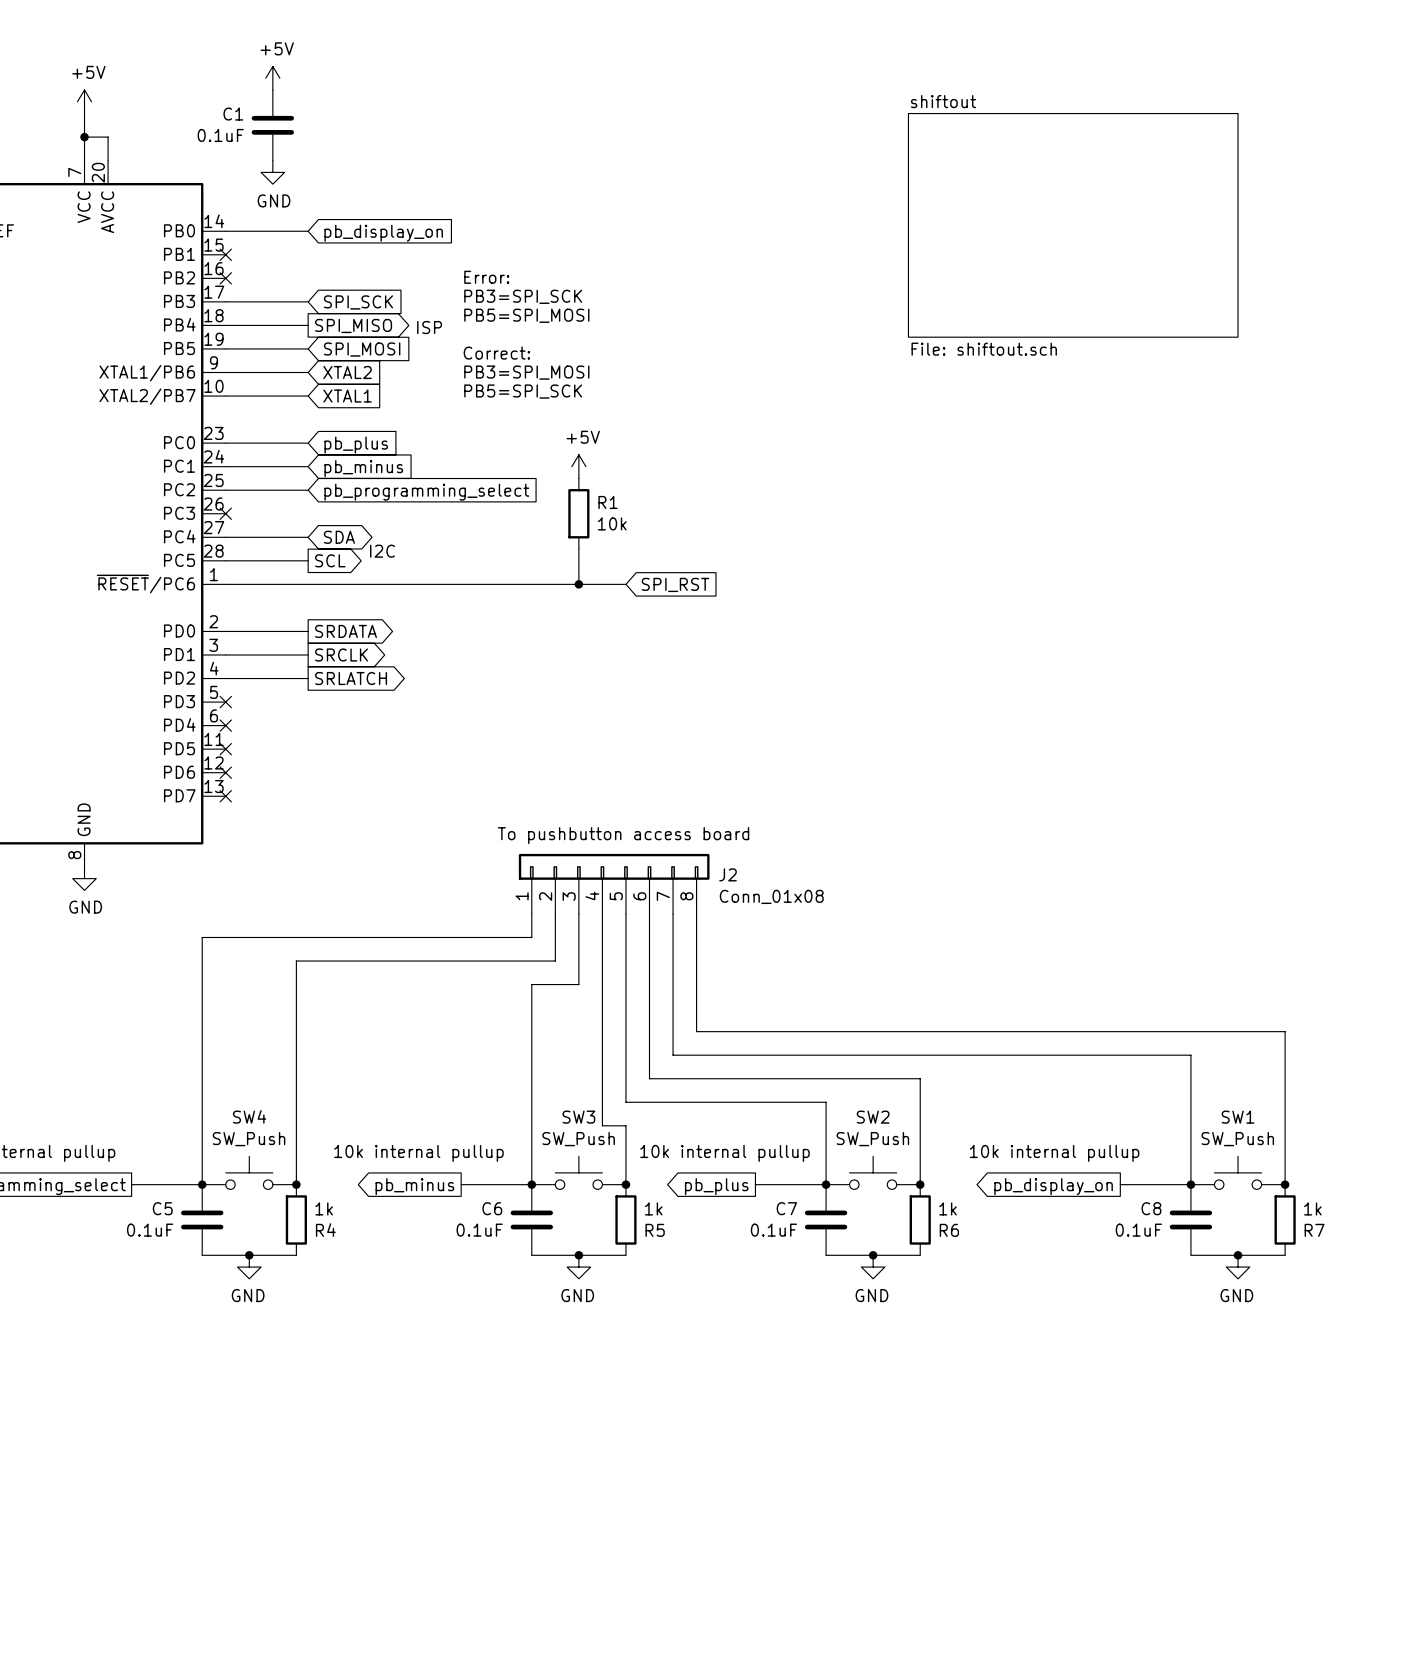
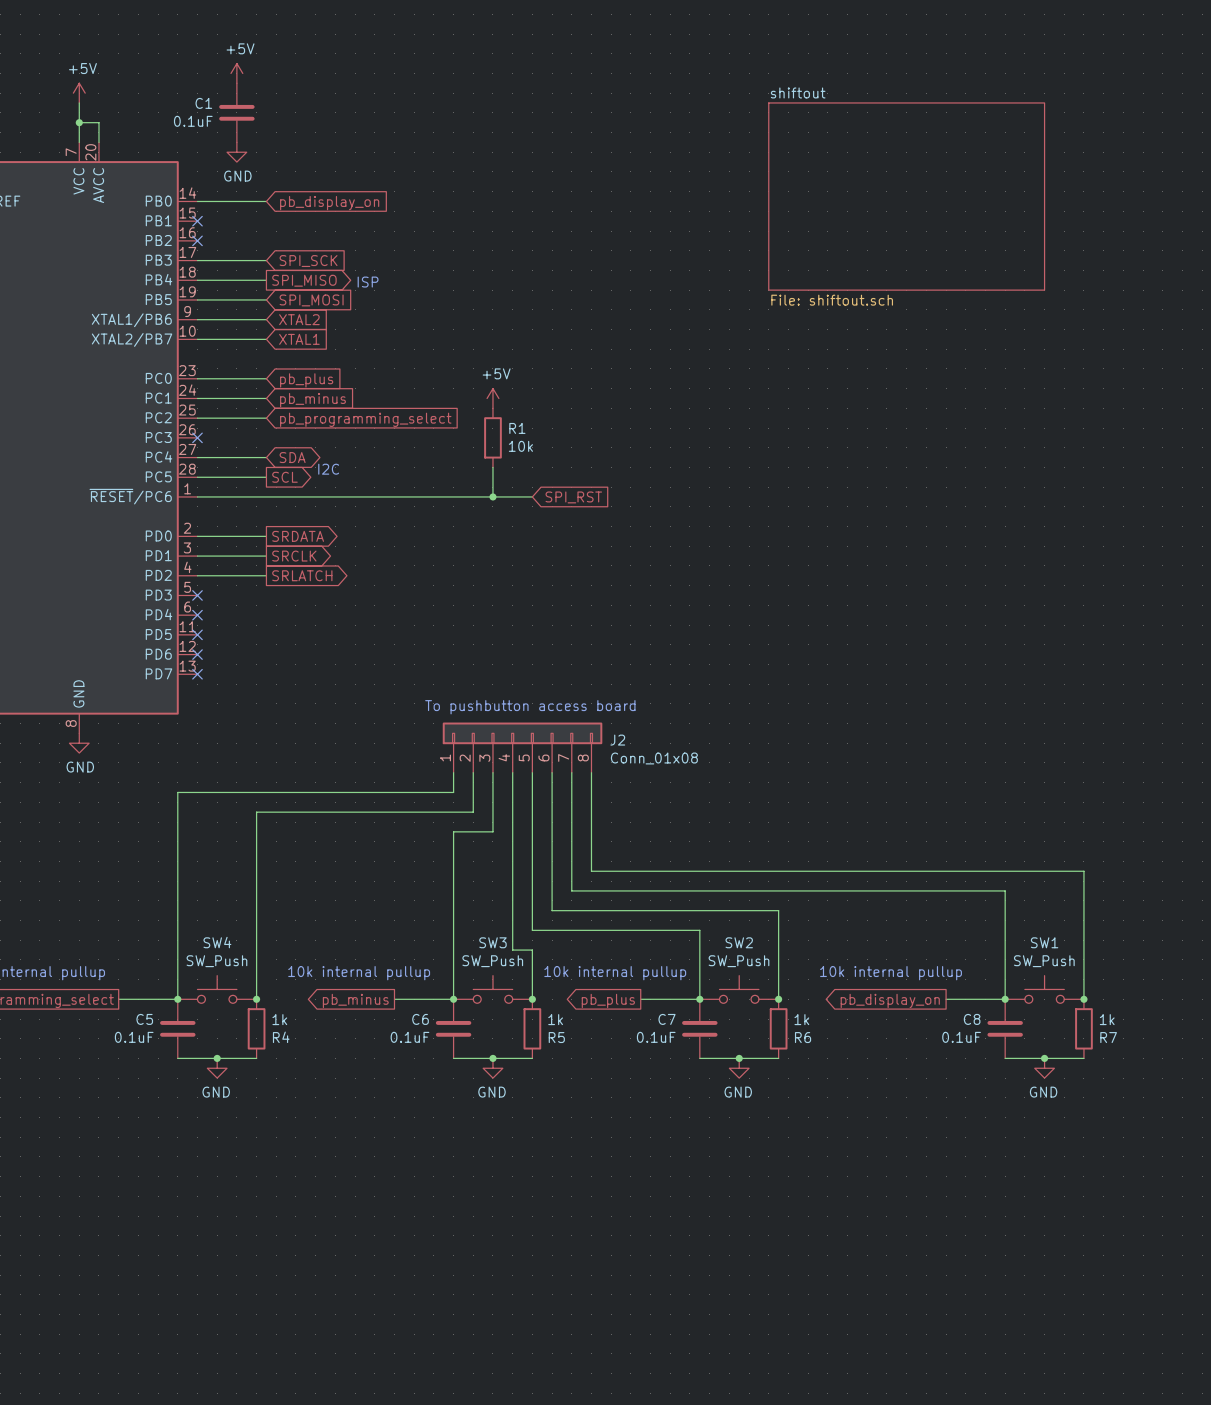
text: Error: (486, 277) -> none
text: PB3=SPI_SCK (523, 296) -> none
text: PB5=SPI_MOSI (526, 315) -> none
text: Correct: (496, 353) -> none
text: PB3=SPI_MOSI (526, 372) -> none
text: PB5=SPI_SCK (523, 391) -> none

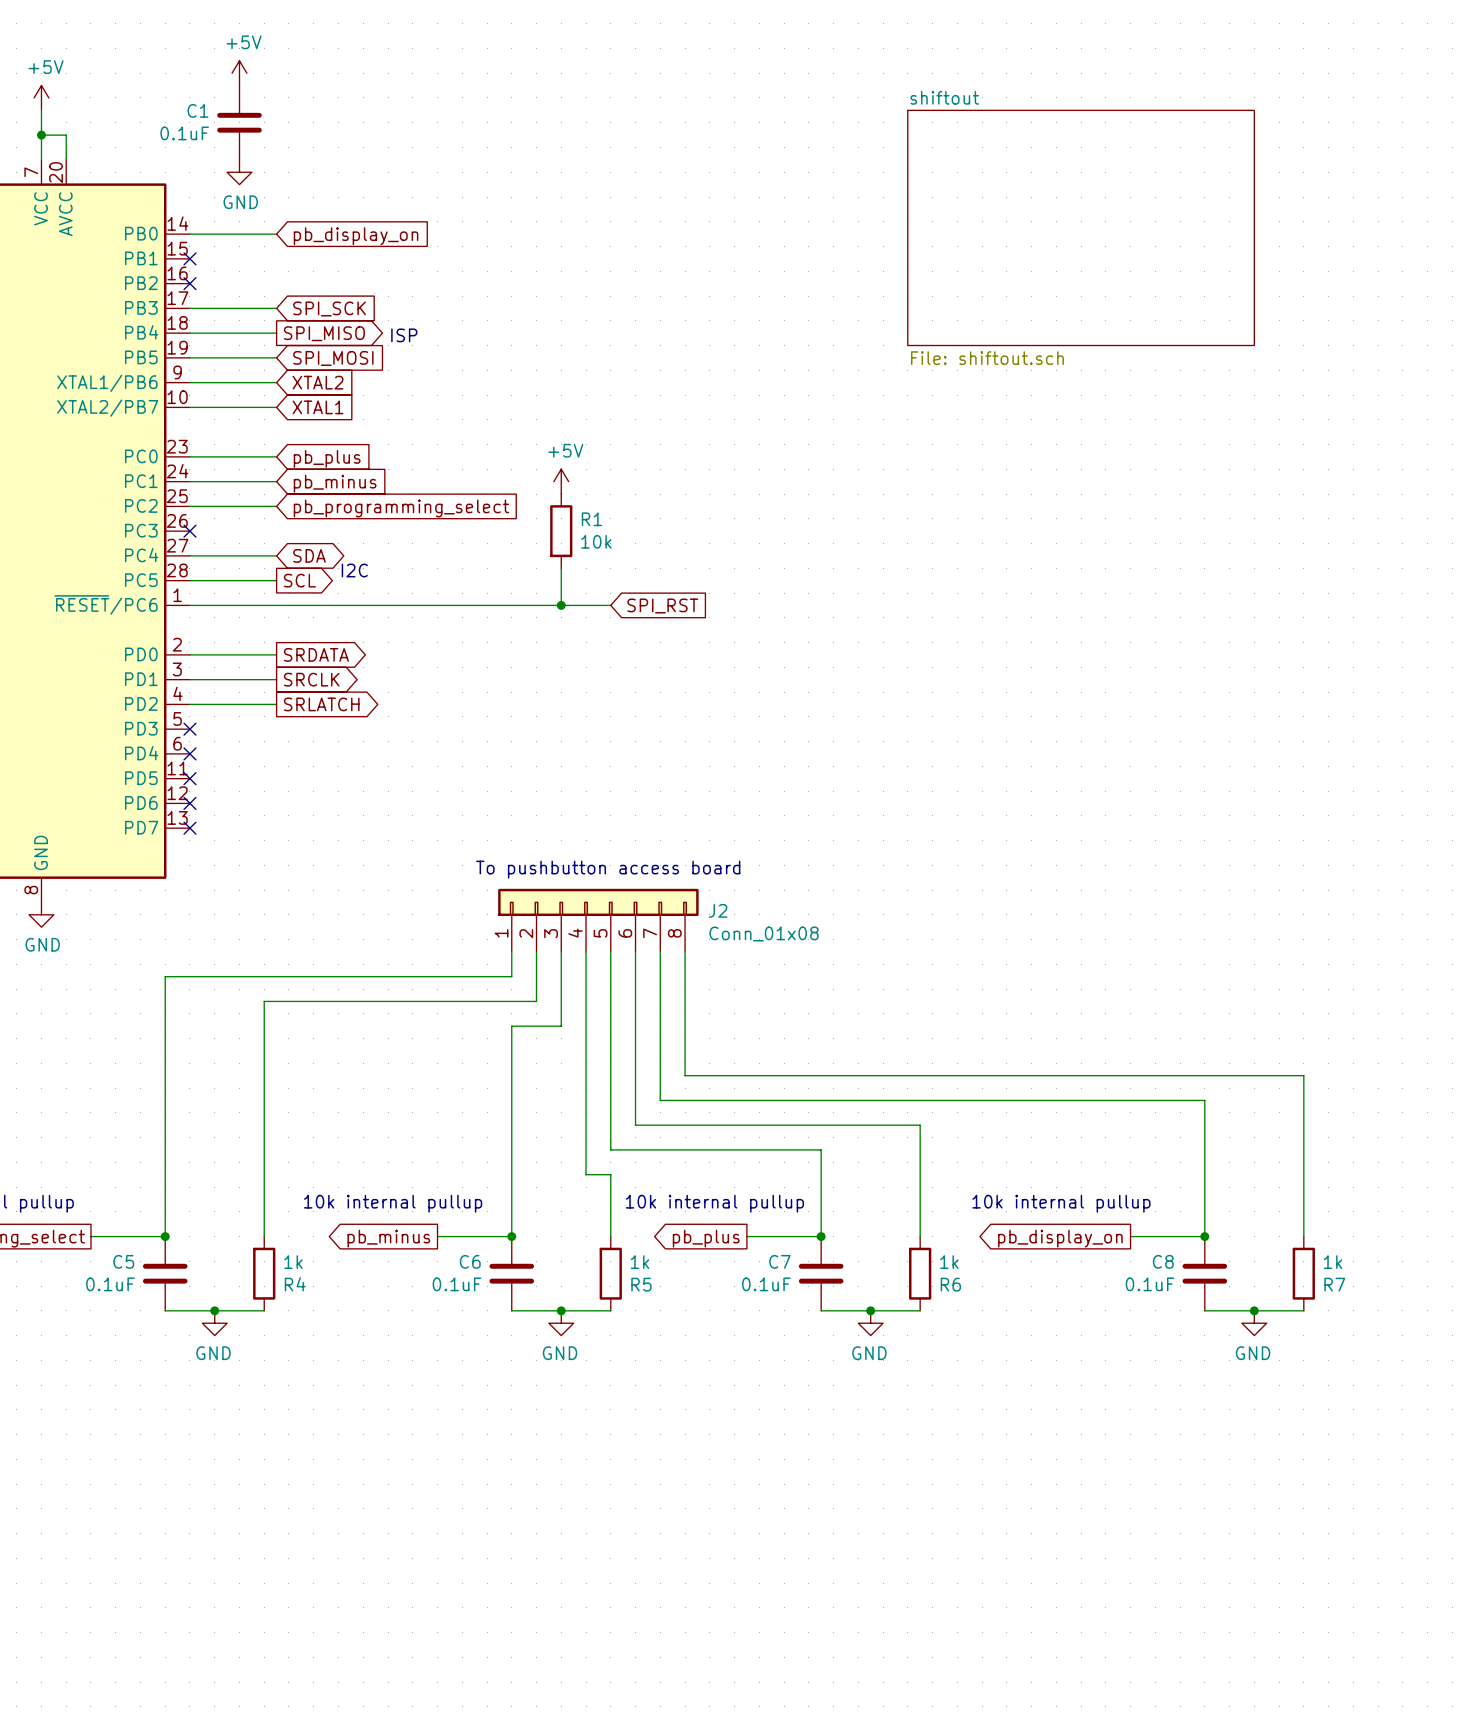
SW4: SW_Push (217, 989) -> none
SW3: SW_Push (492, 989) -> none
SW2: SW_Push (739, 989) -> none
SW1: SW_Push (1044, 989) -> none
junction: (256, 999) -> none
junction: (532, 999) -> none
junction: (778, 999) -> none
junction: (1083, 999) -> none

